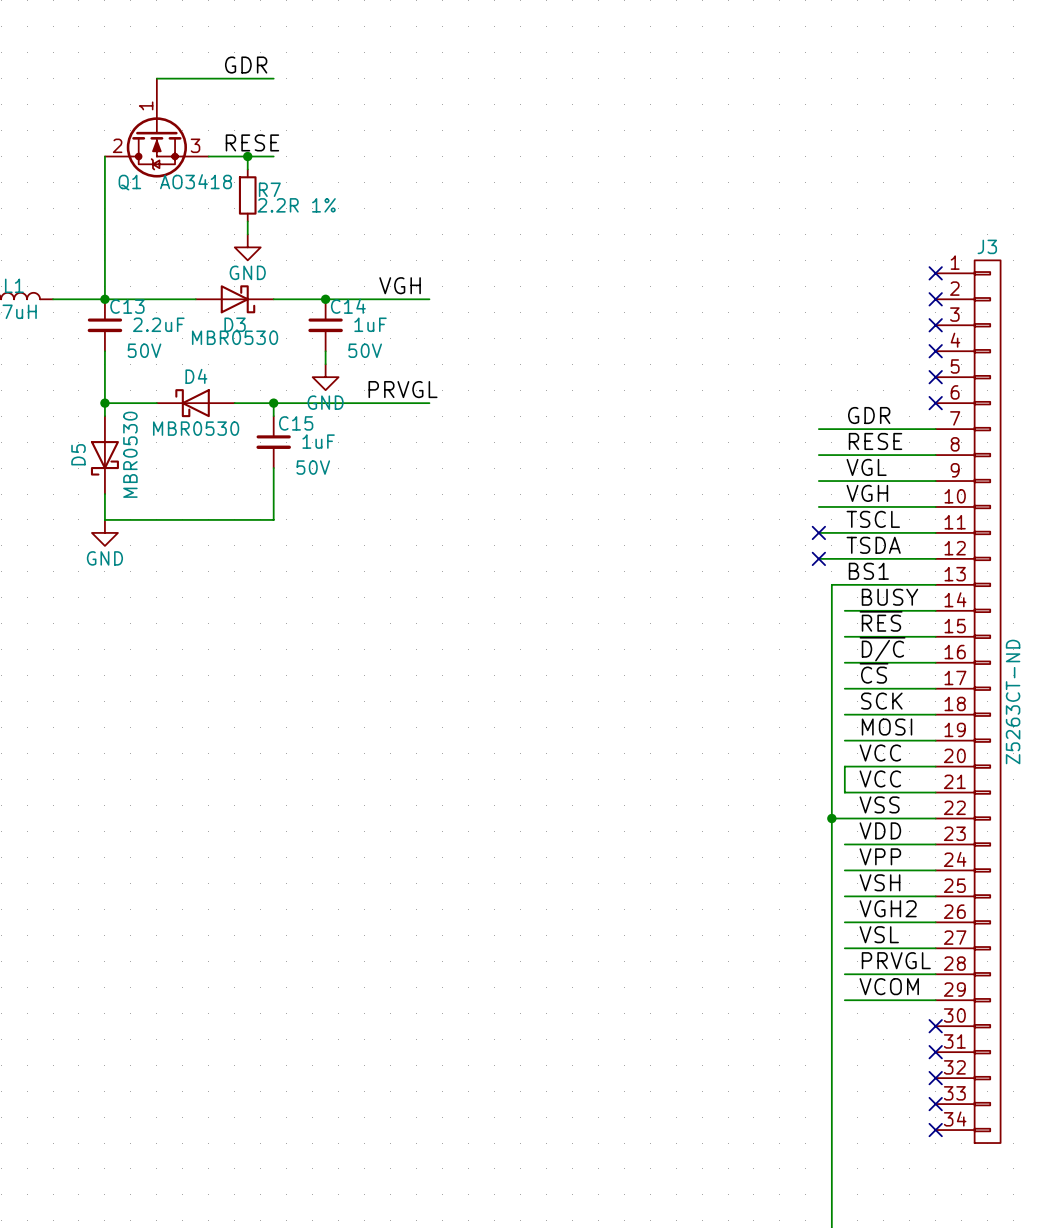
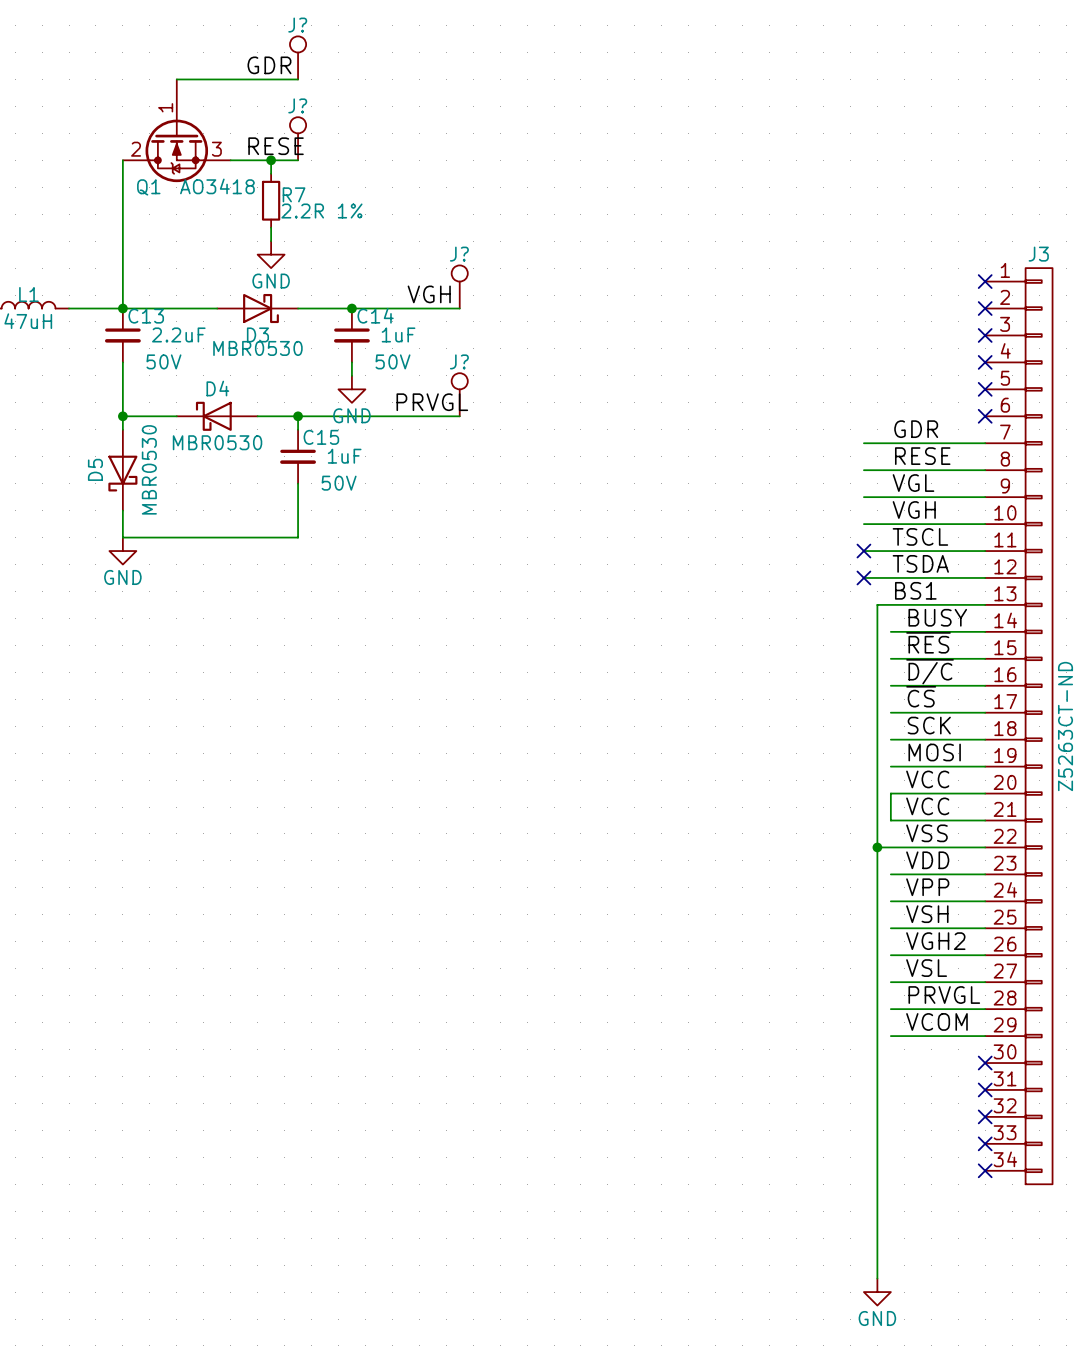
J?: none -> (298, 57)
J?: none -> (298, 138)
J?: none -> (459, 286)
J?: none -> (459, 394)

